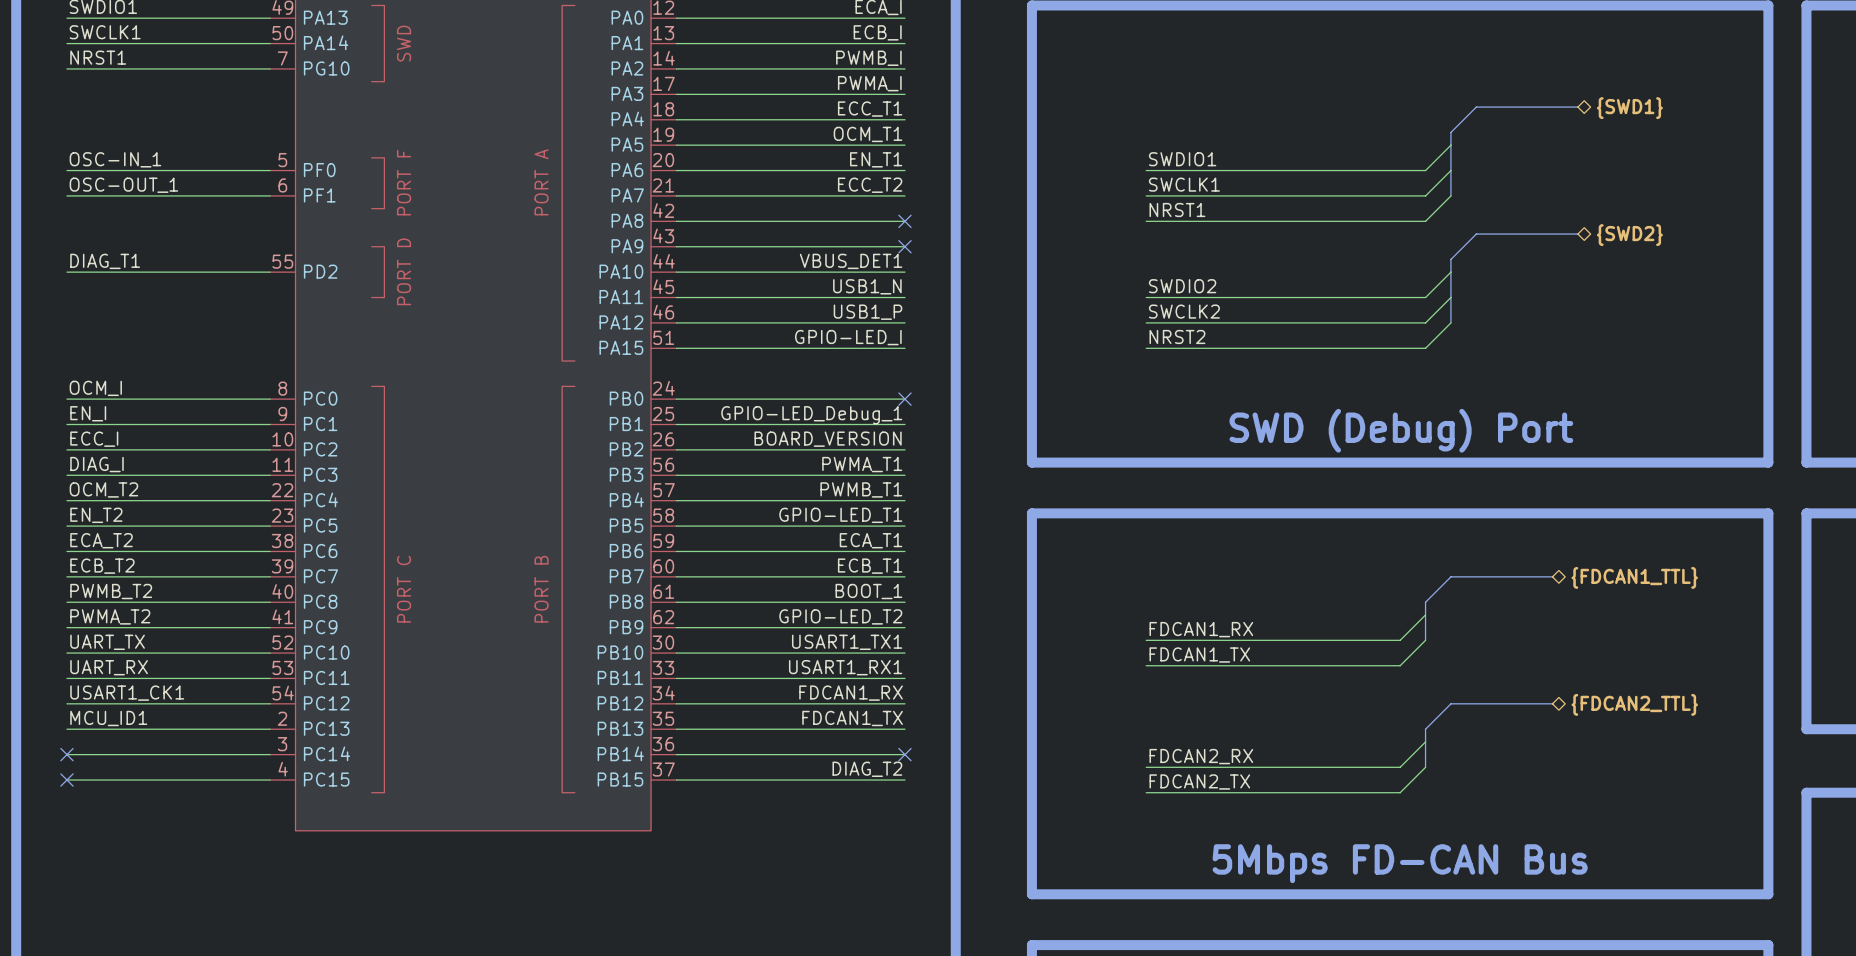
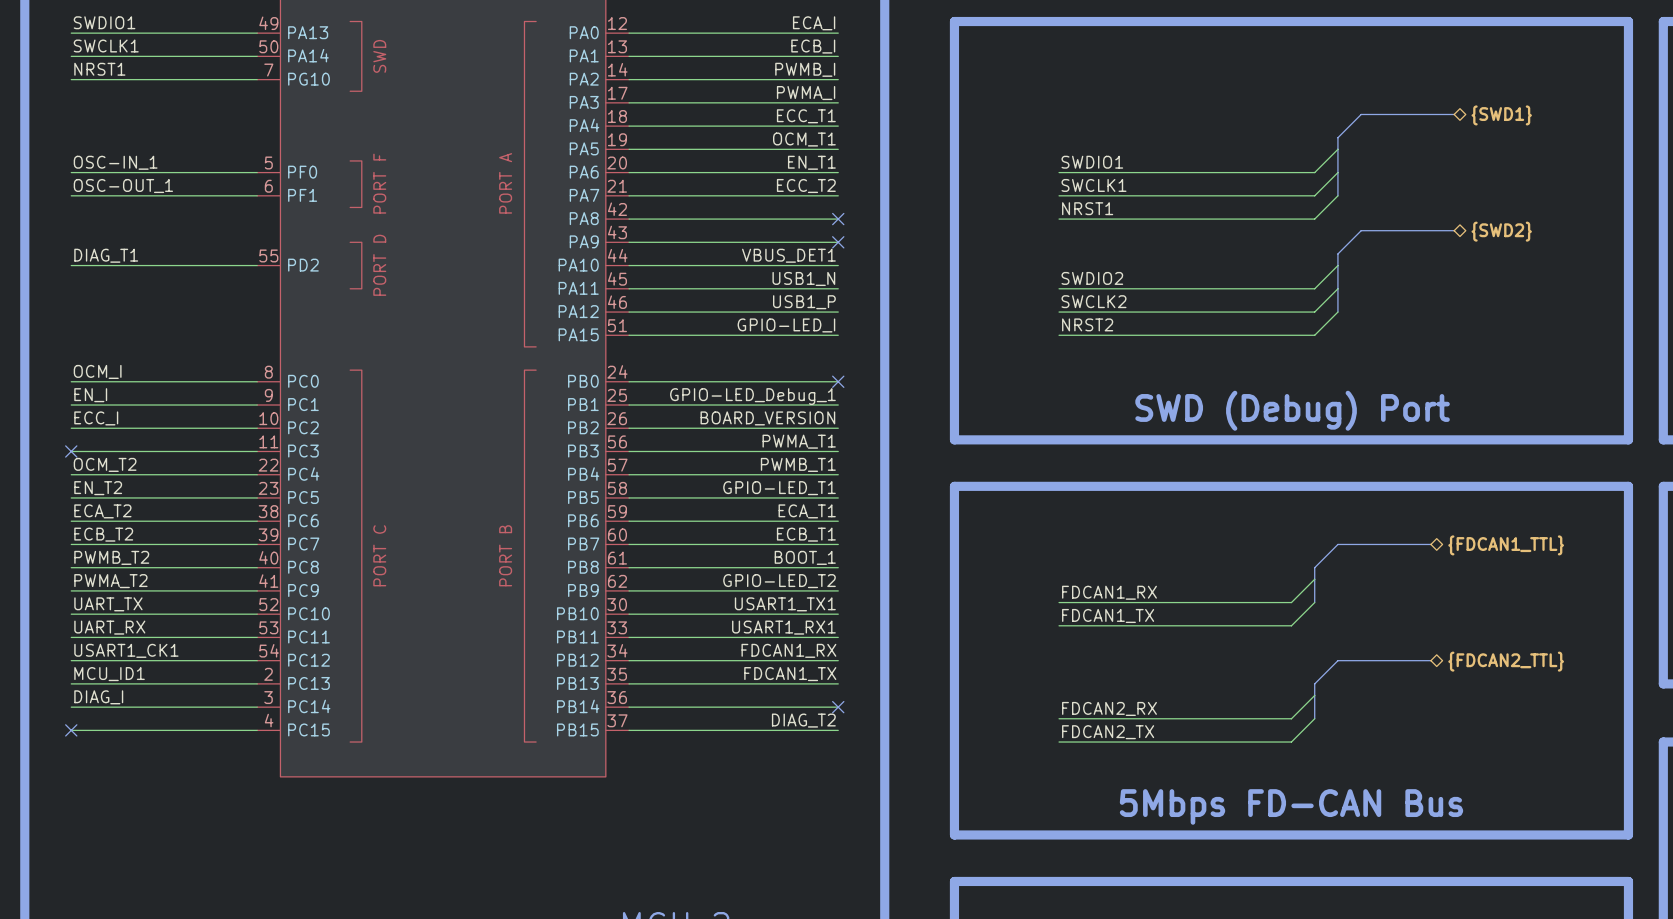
label: DIAG_I (96, 464) -> none
no-connect mark: none -> (71, 451)
label: none -> DIAG_I (98, 697)
no-connect mark: (66, 754) -> none

